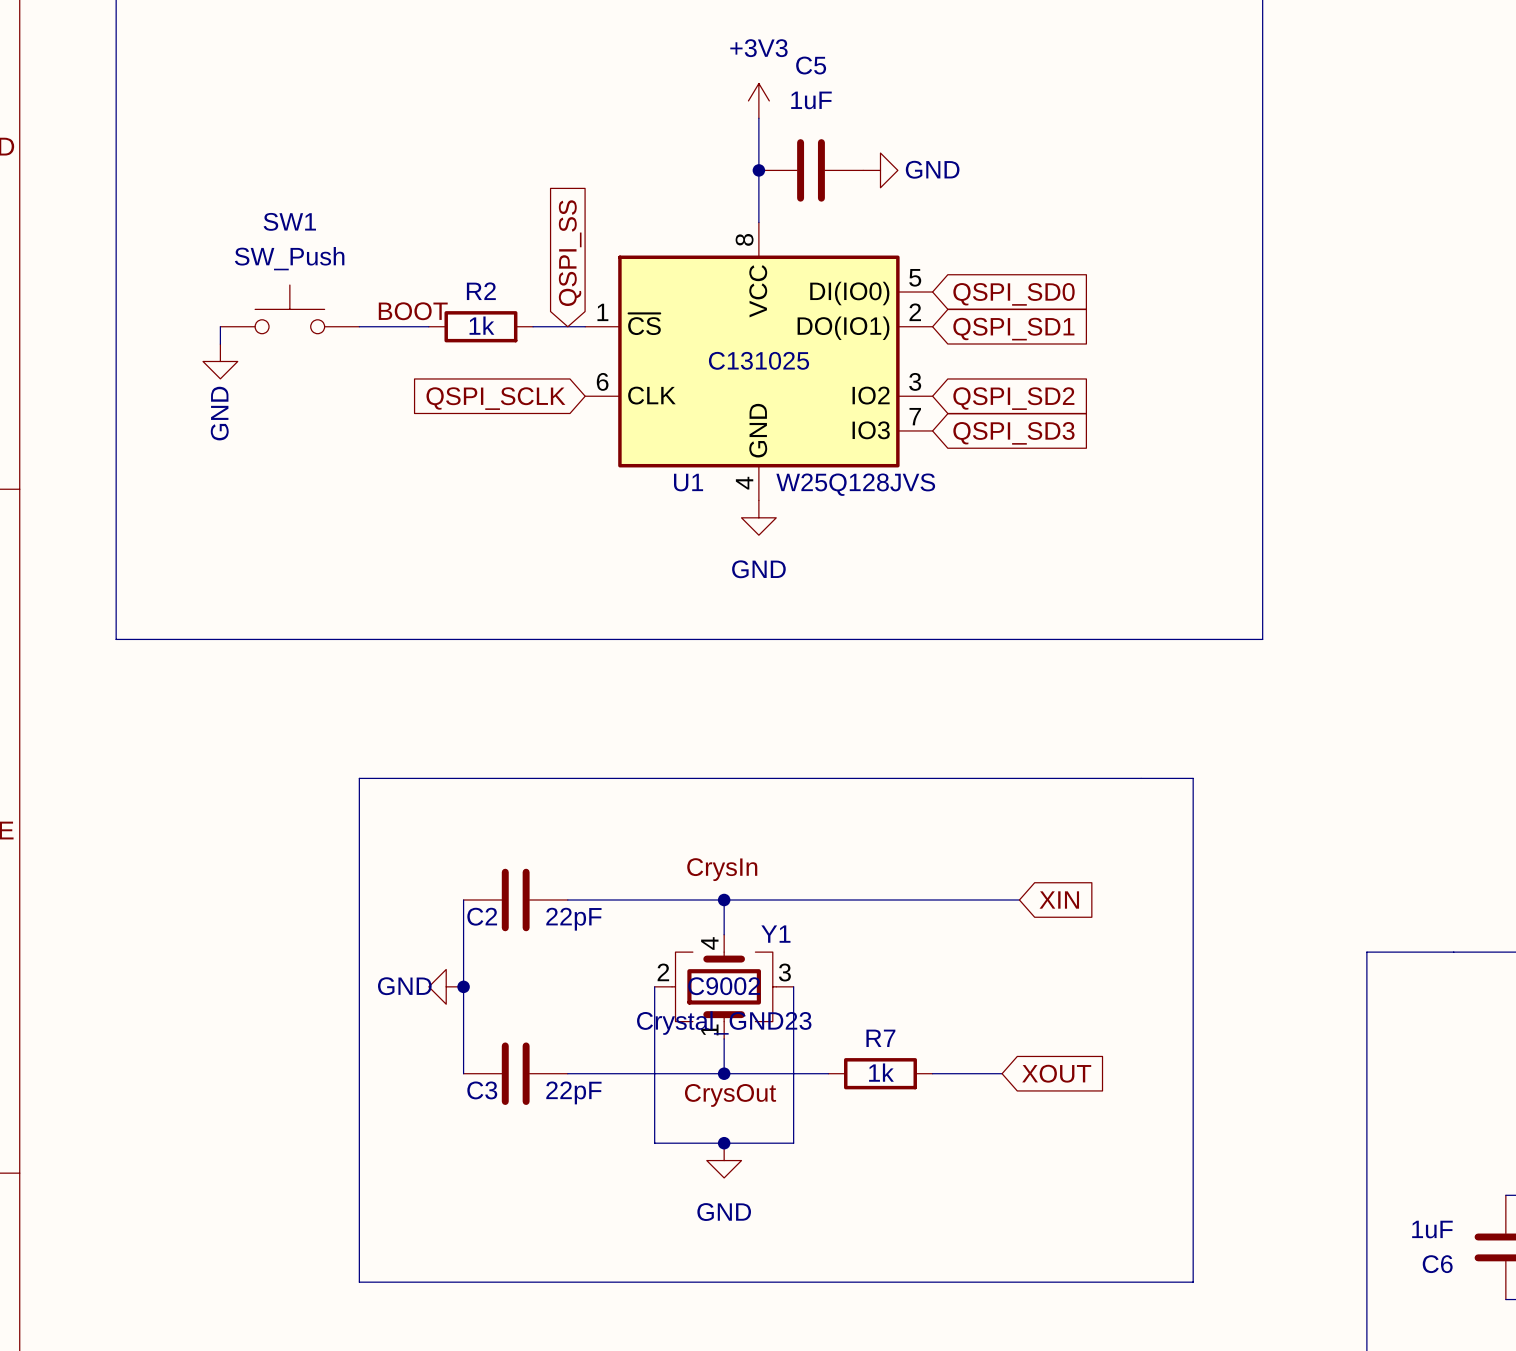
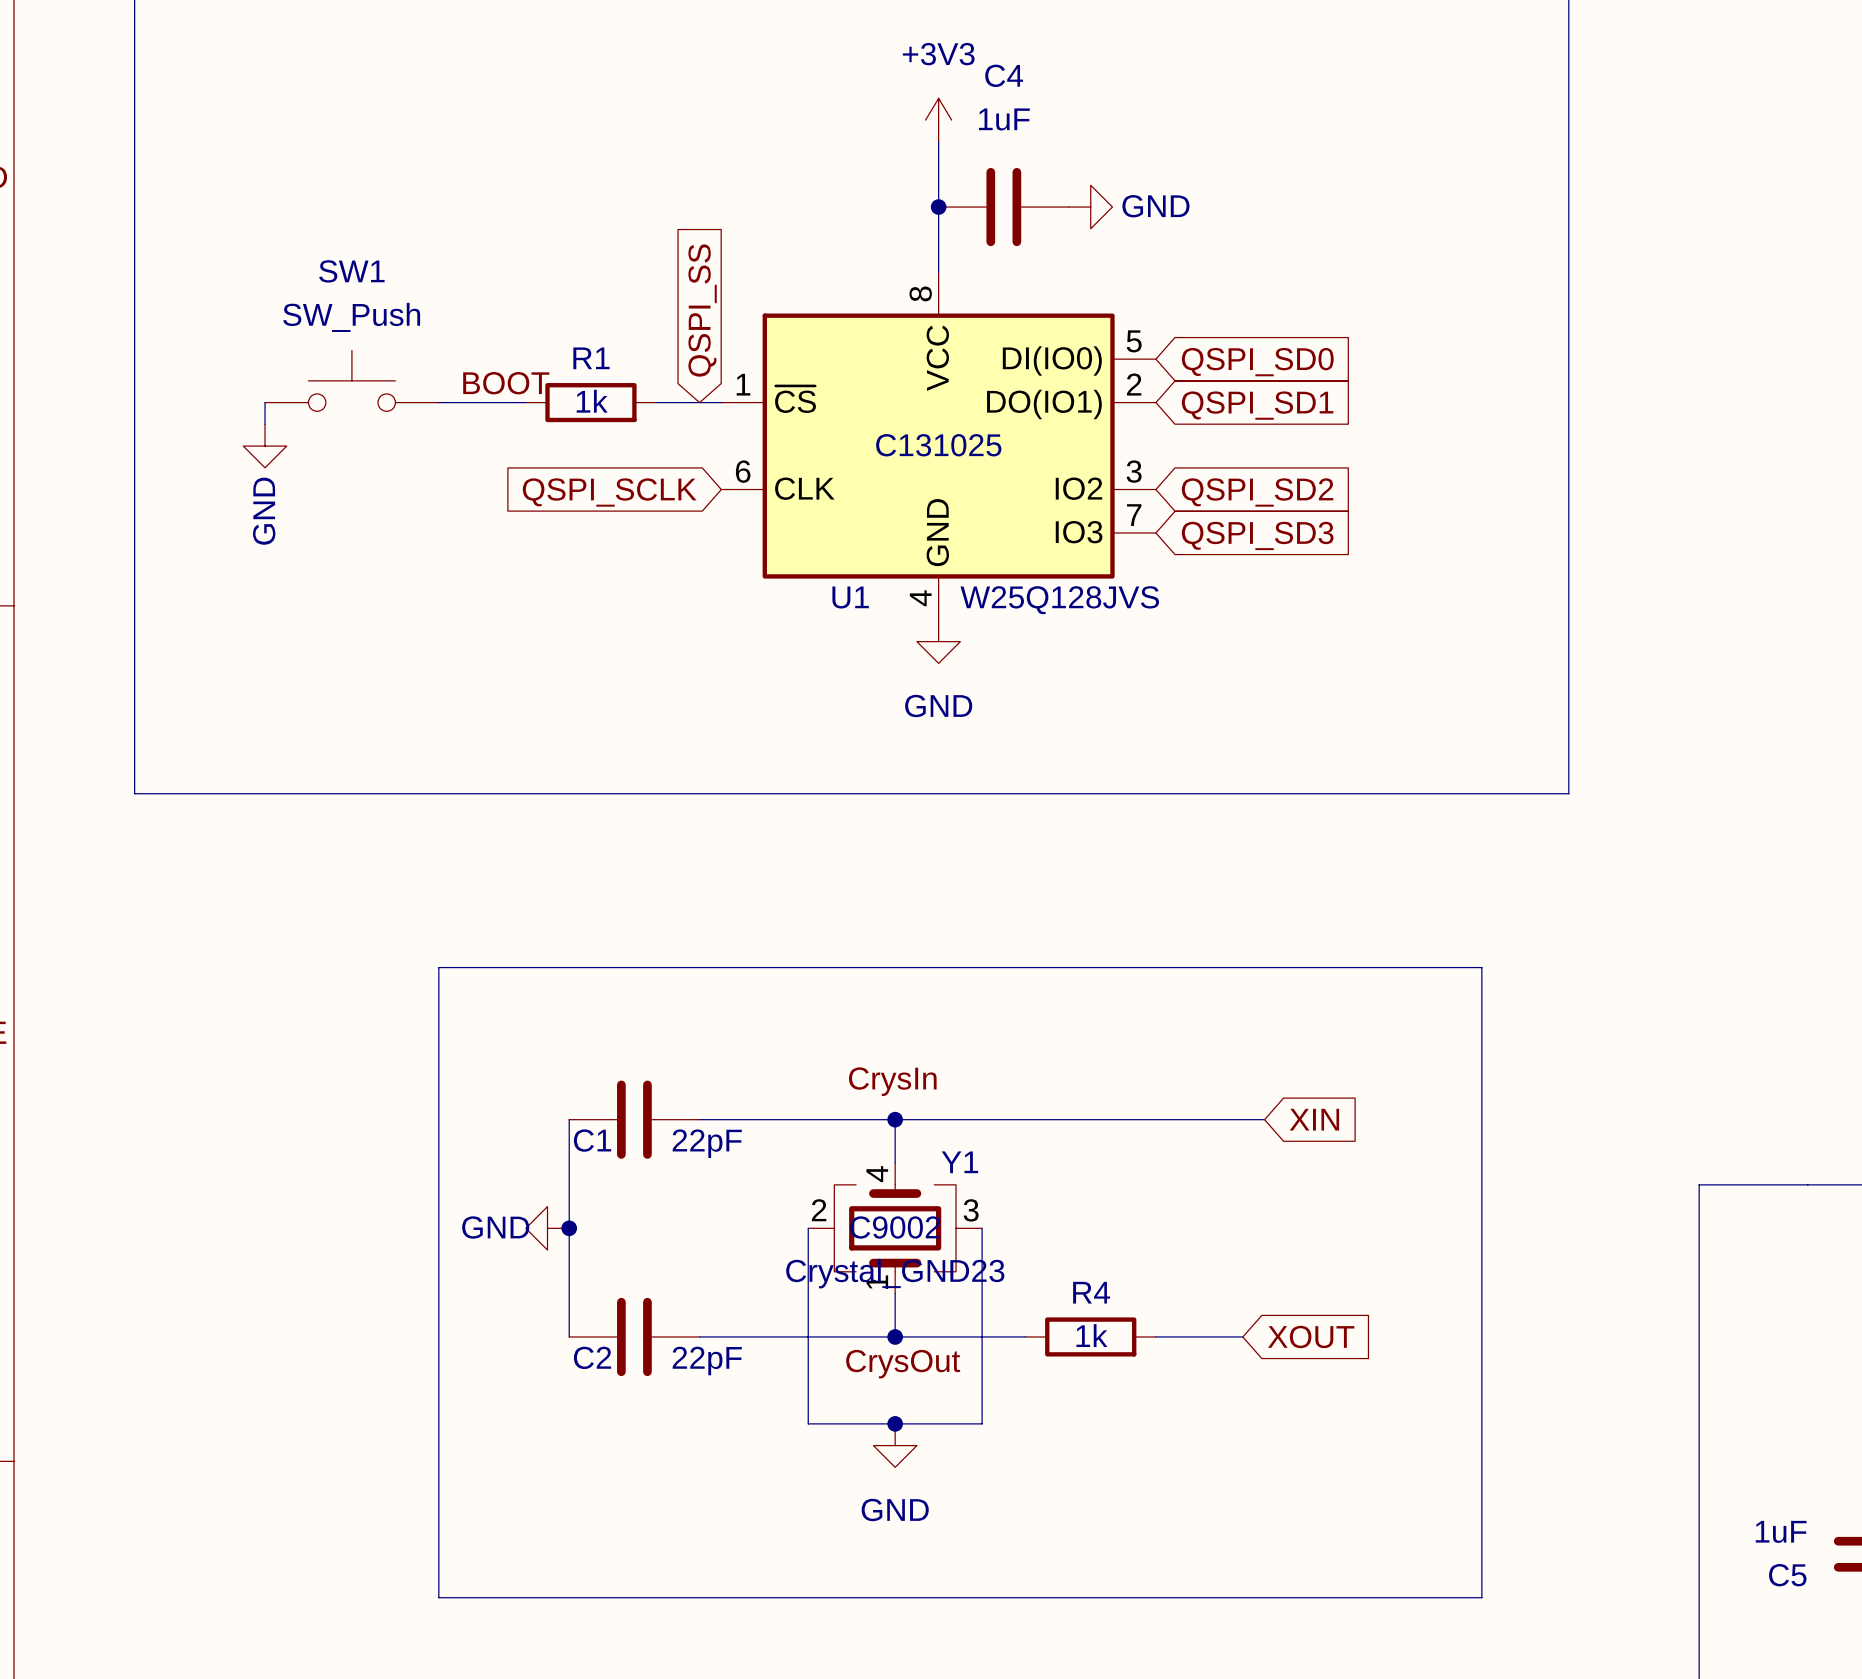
C5 name: C5 (811, 65) -> C4 (1004, 75)
R2 name: R2 (481, 291) -> R1 (591, 358)
C2 name: C2 (482, 916) -> C1 (592, 1140)
R7 name: R7 (880, 1038) -> R4 (1091, 1292)
C3 name: C3 (482, 1090) -> C2 (592, 1357)
C6 name: C6 (1437, 1264) -> C5 (1787, 1575)

